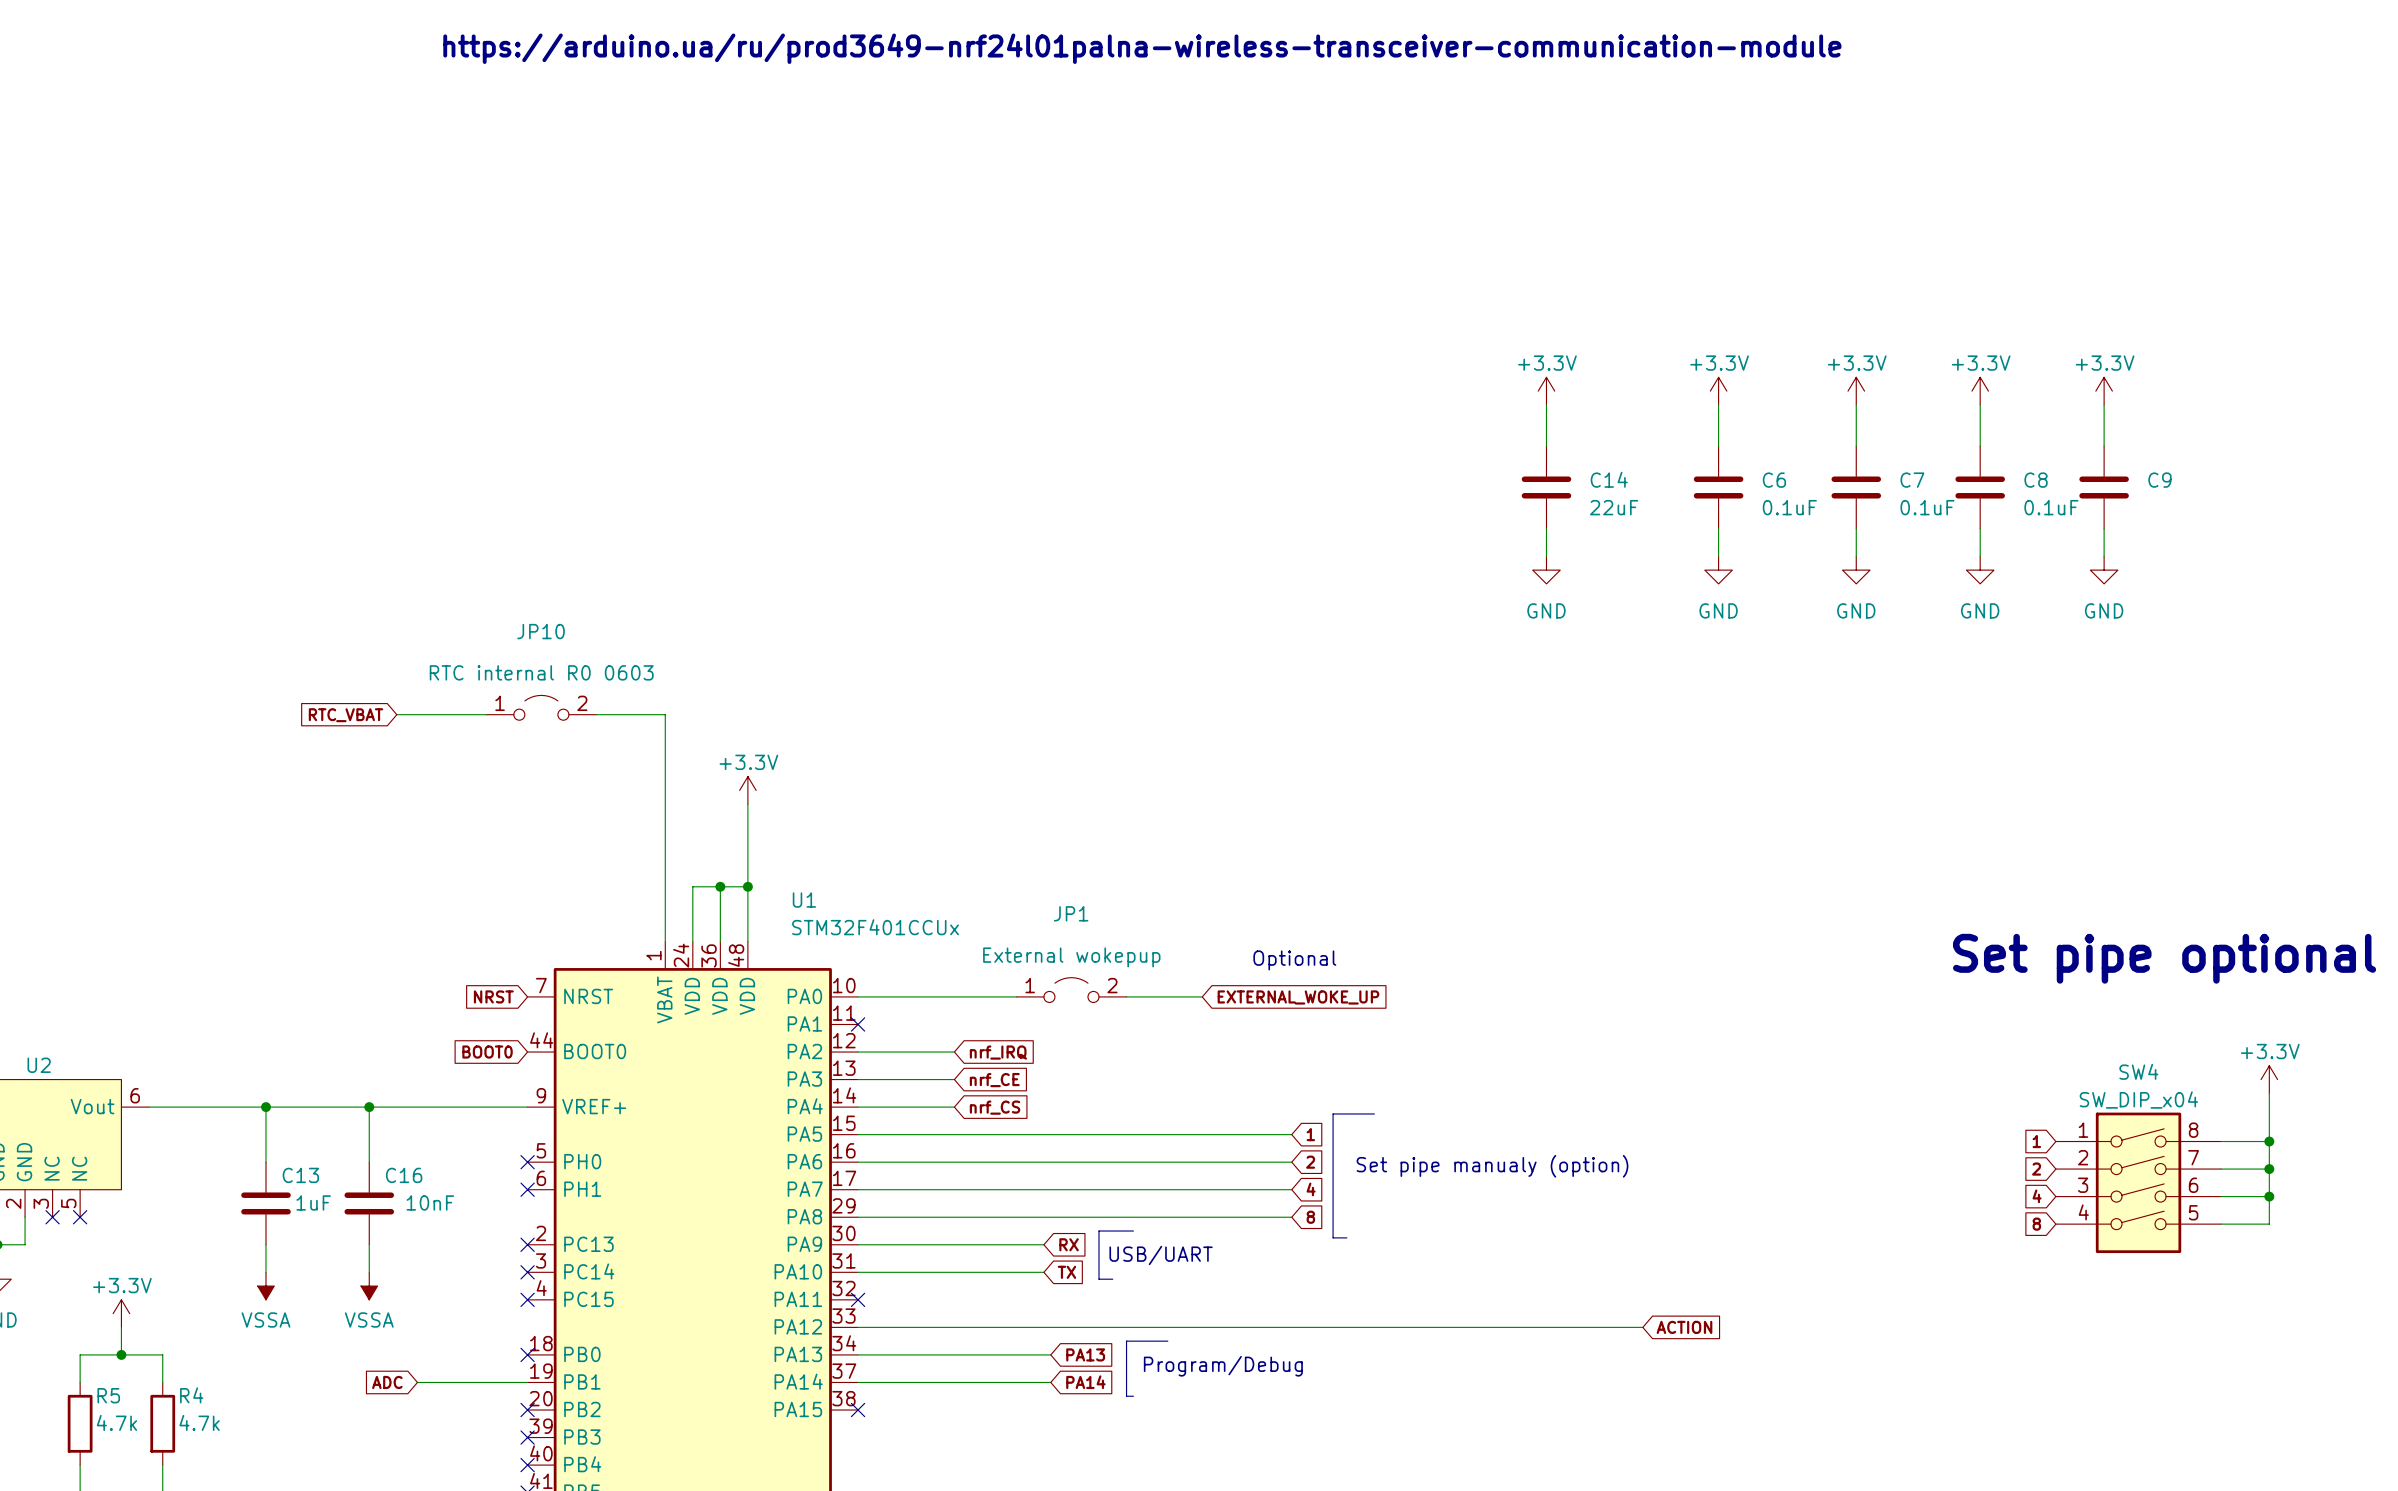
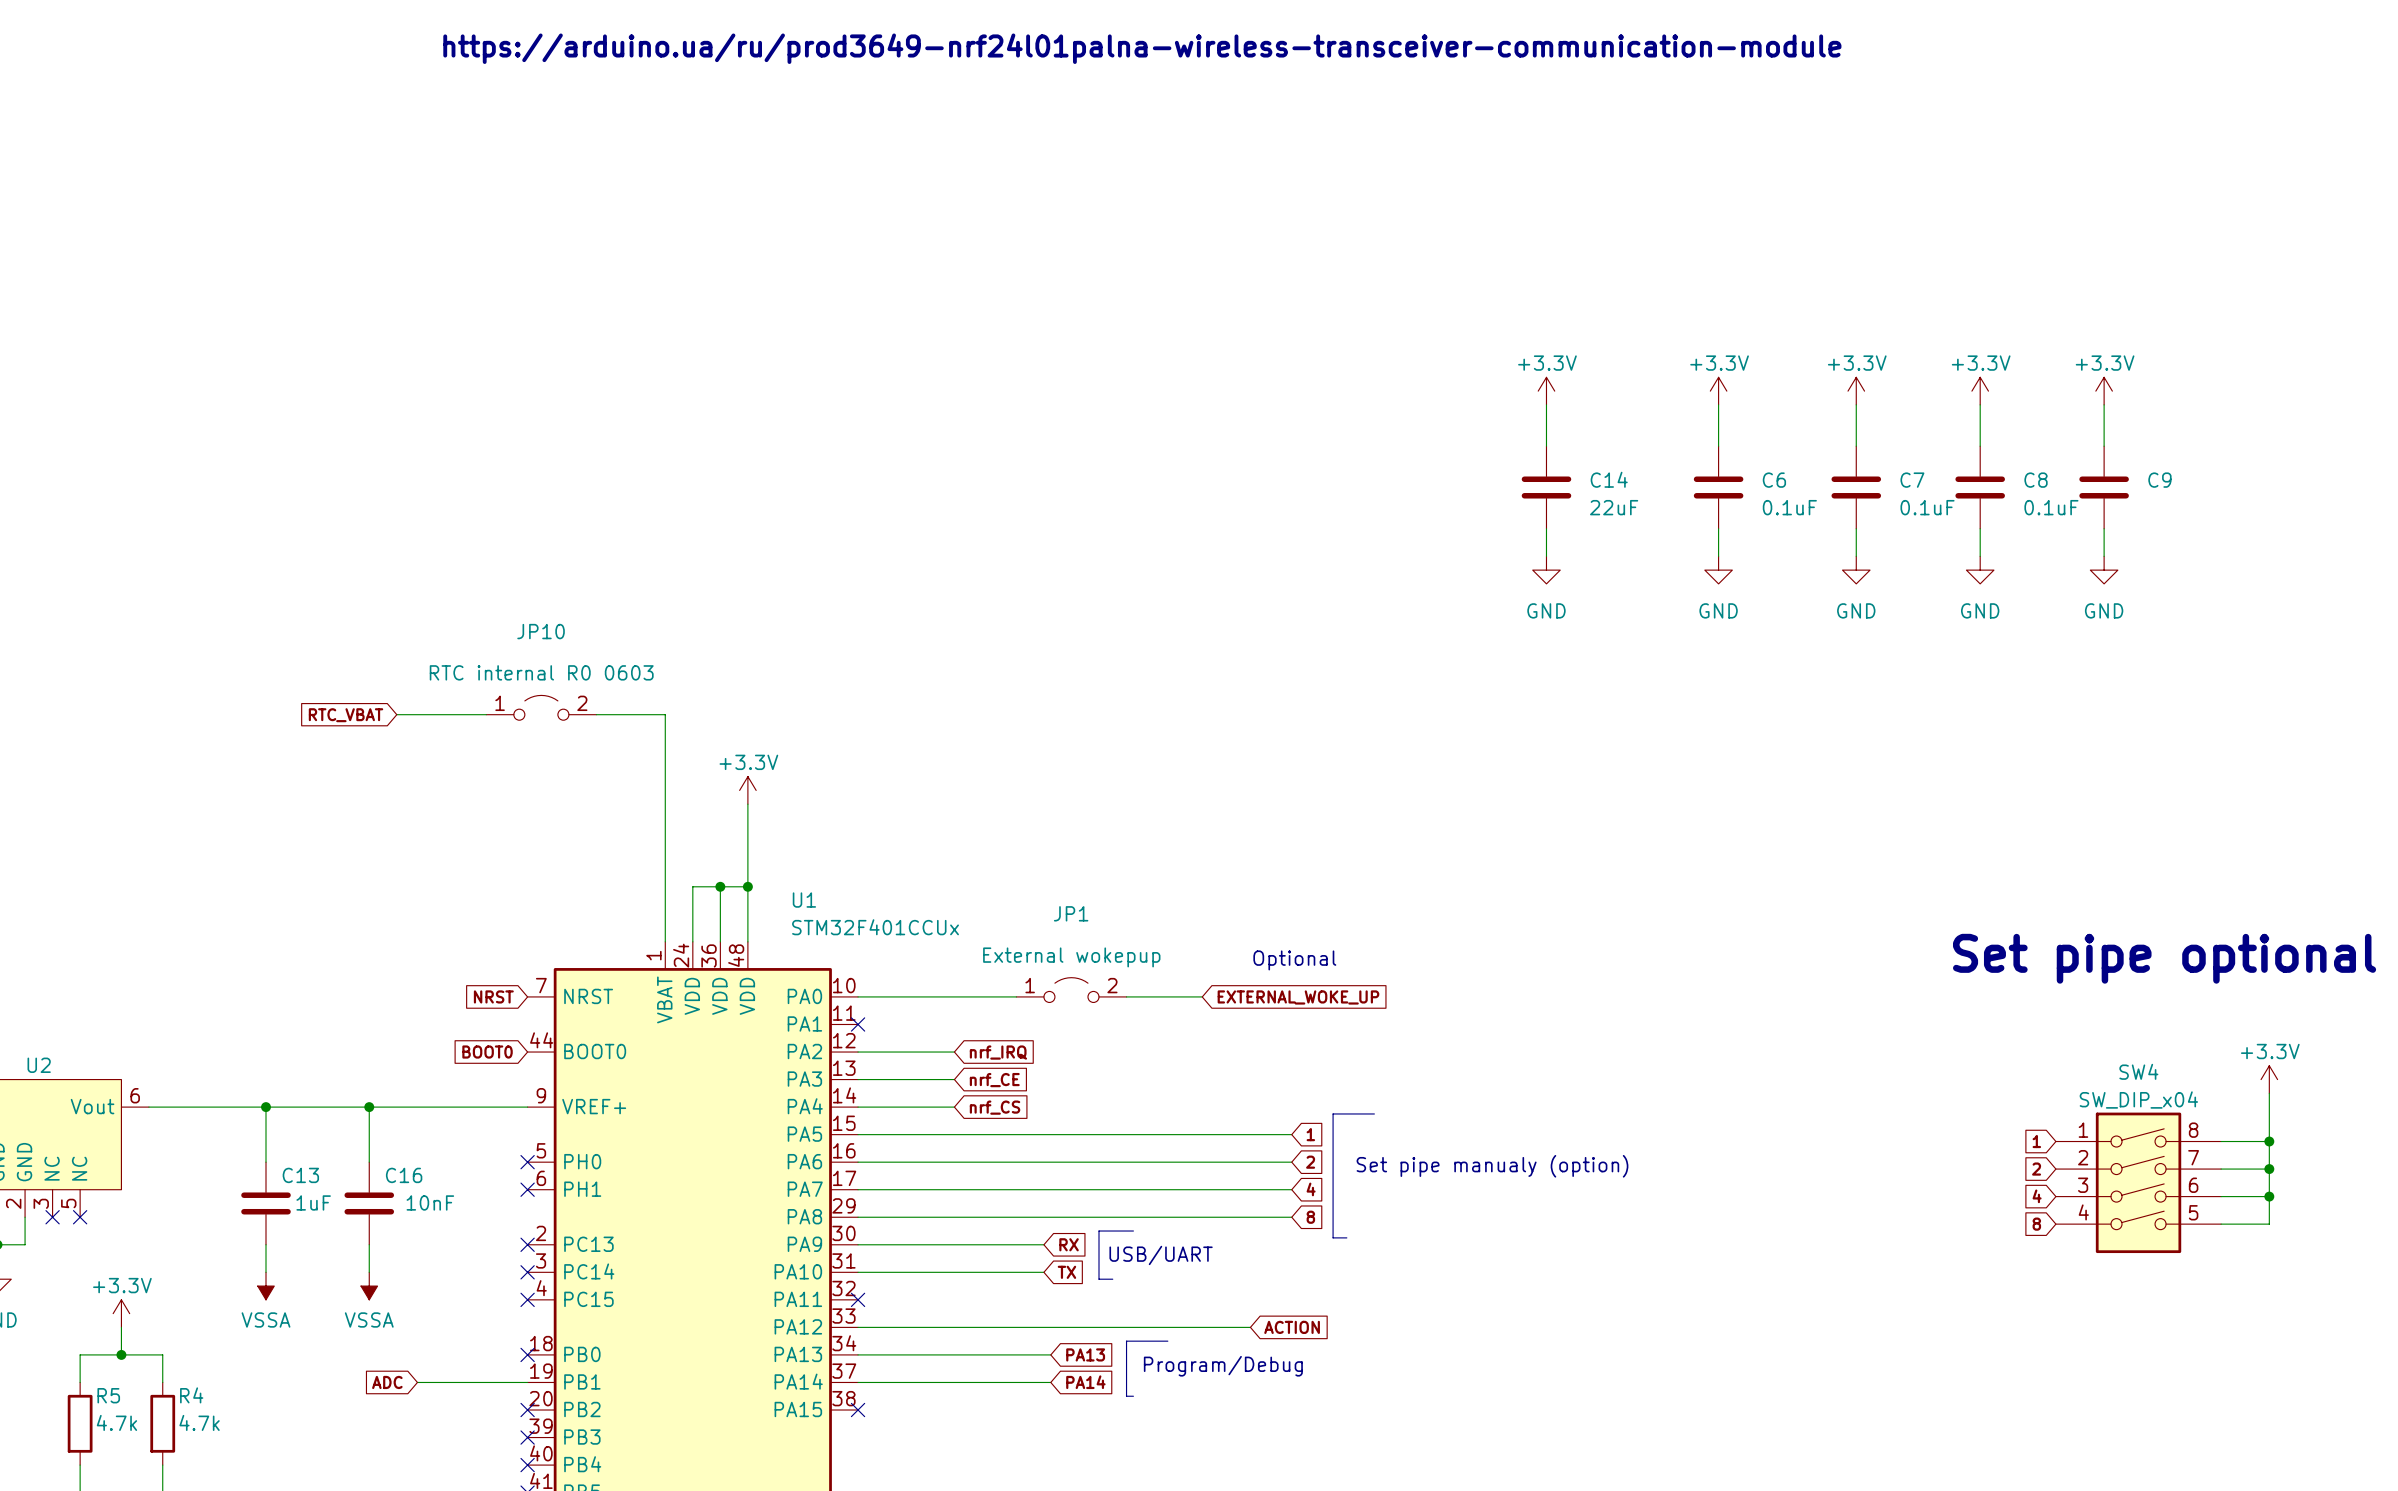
wire: (1250, 1327) (1642, 1327) -> none
global label: none -> ACTION (1292, 1327)
global label: ACTION (1684, 1327) -> none

